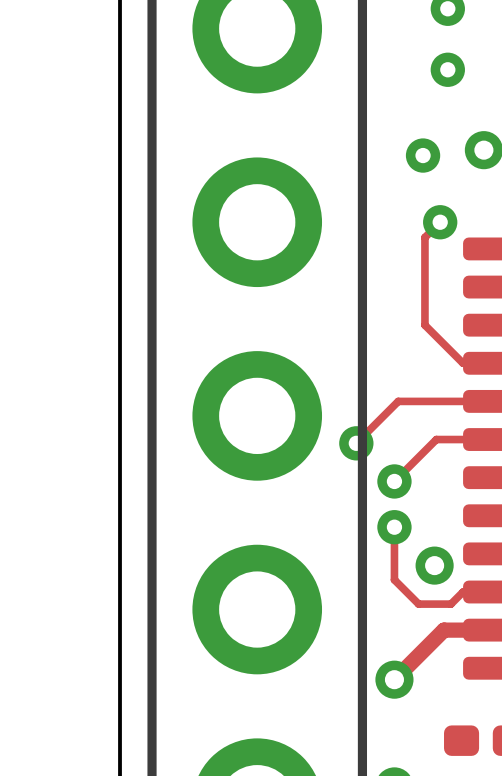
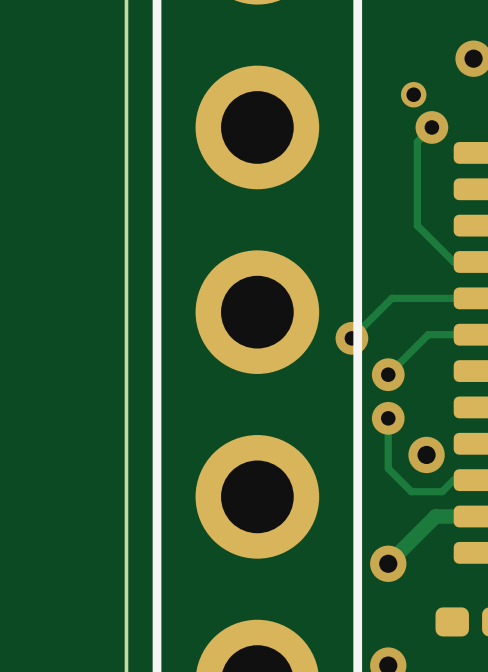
via: (423, 155) -> none
via: none -> (413, 94)

